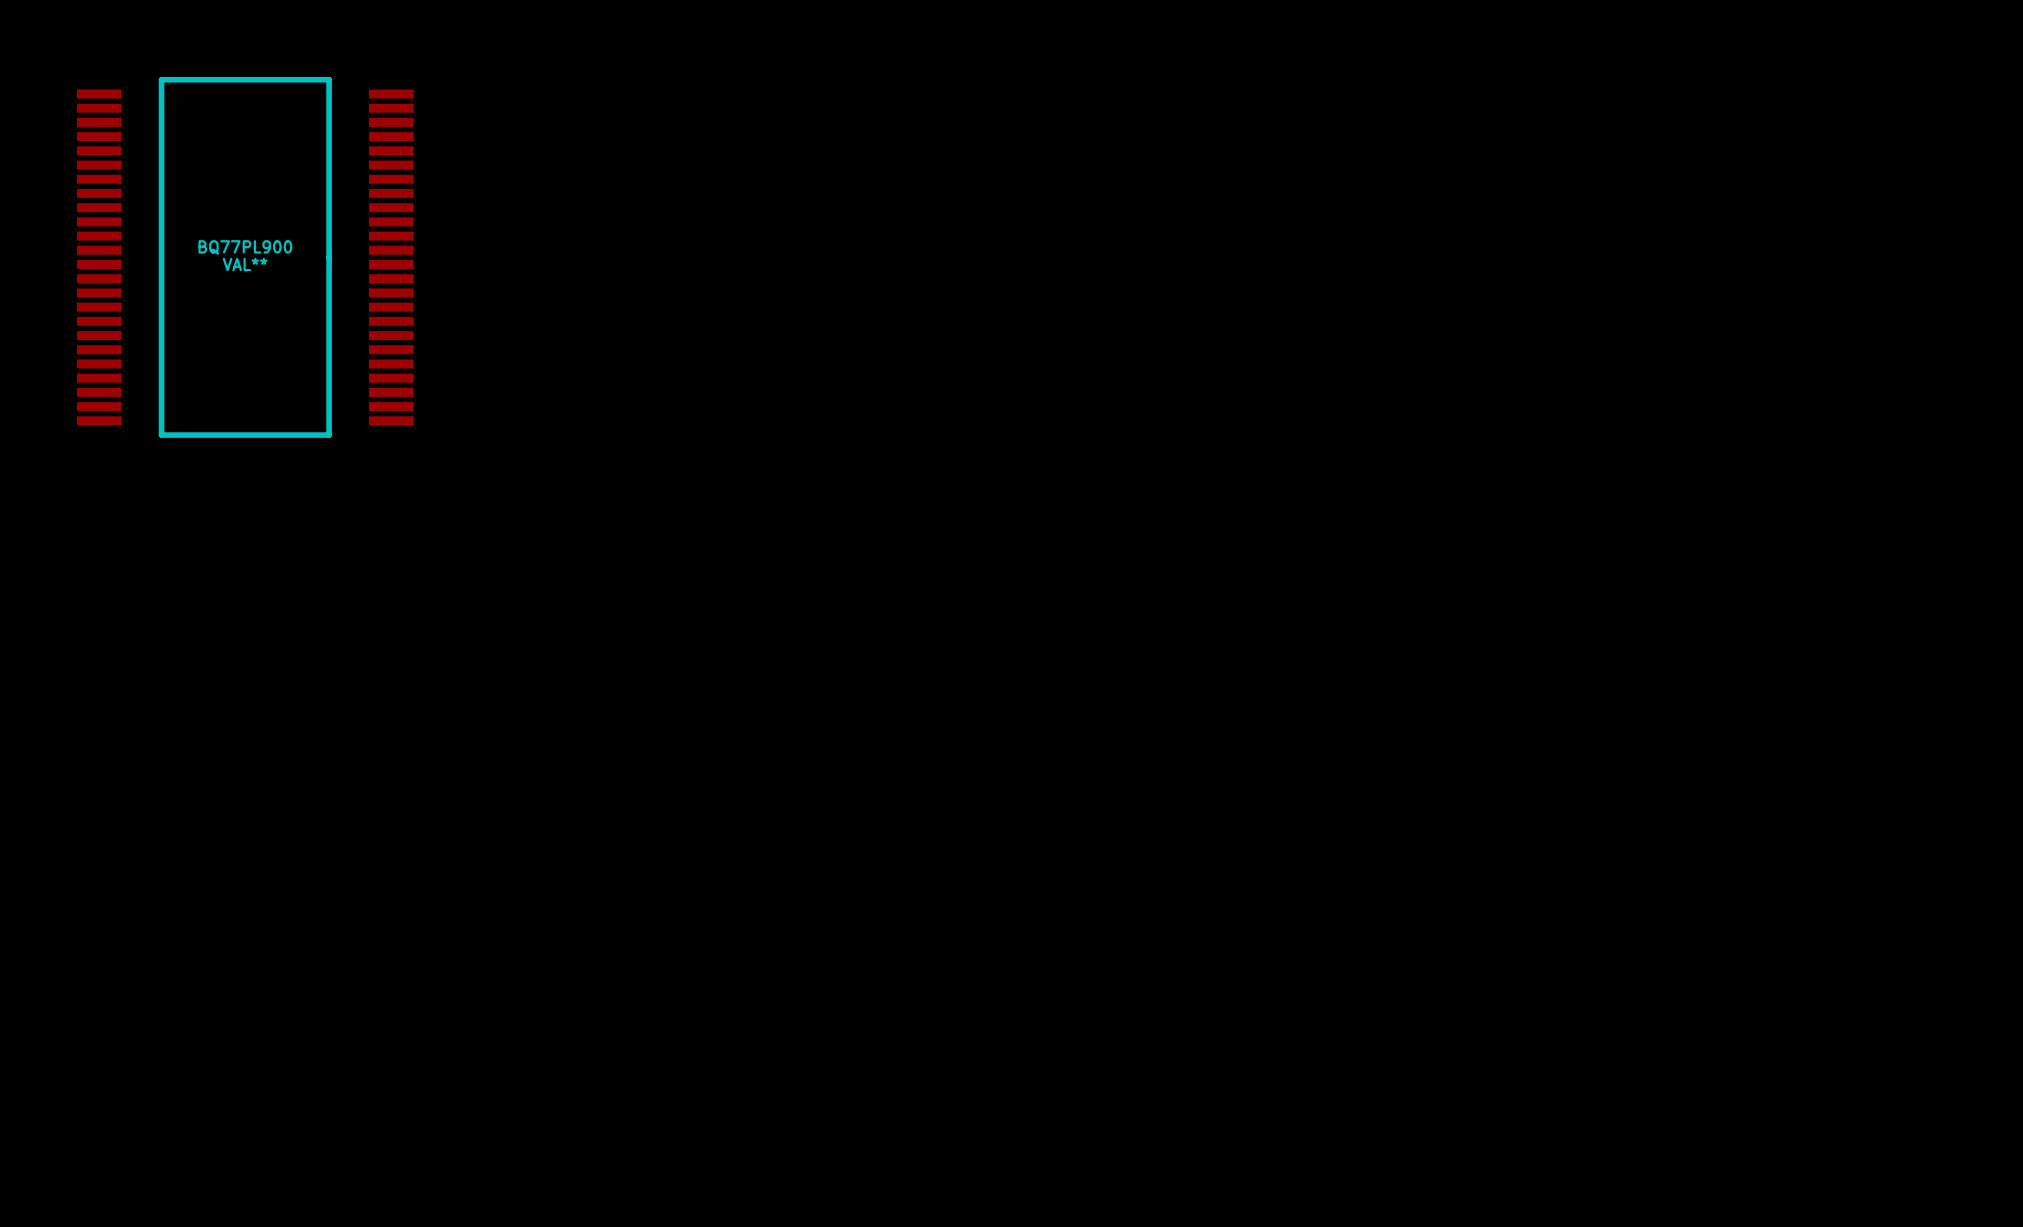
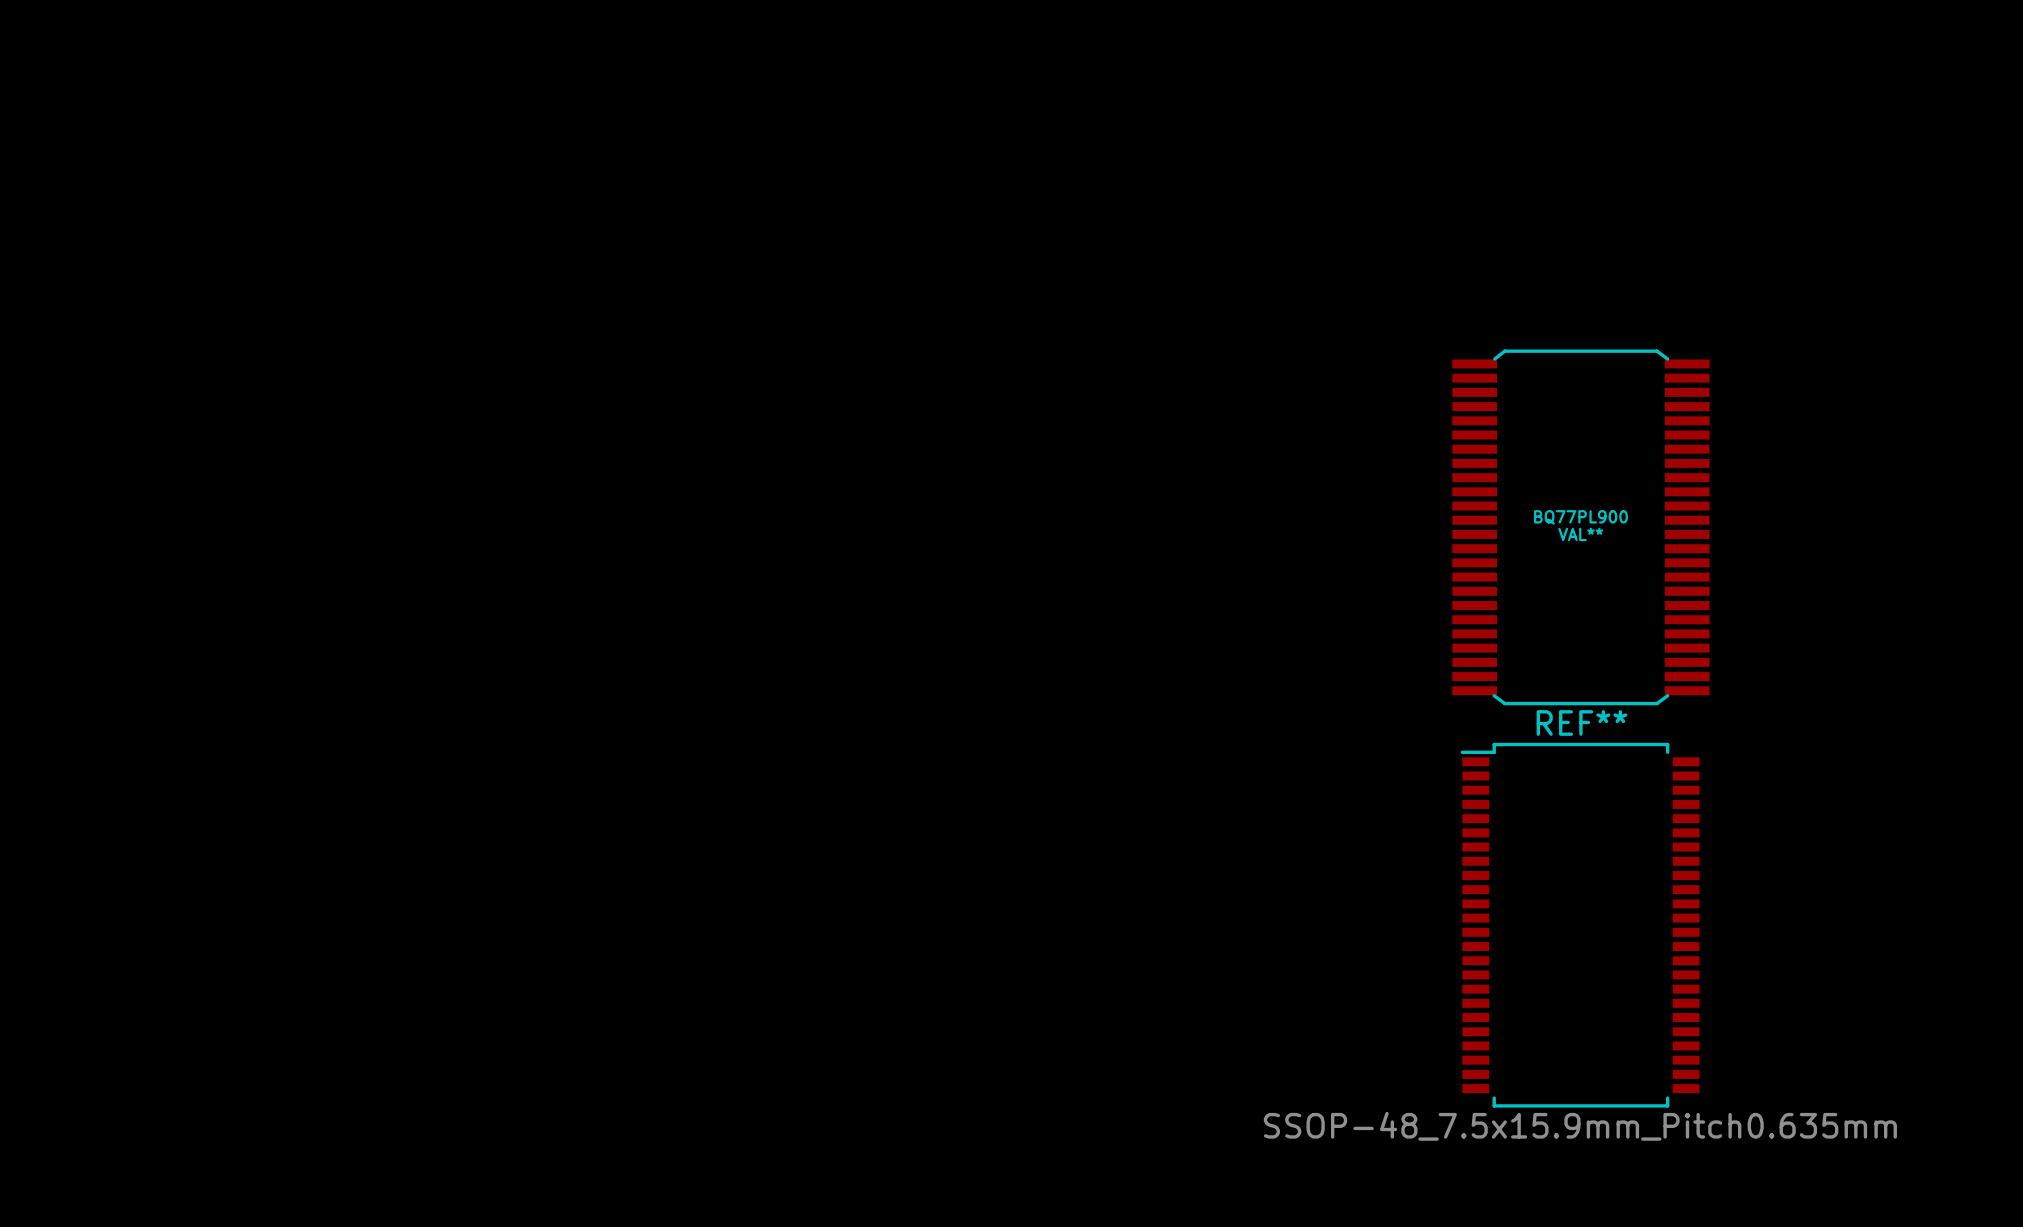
BQ77PL900 footprint: [76, 76, 414, 438] -> [1452, 349, 1710, 706]
REF**: none -> SSOP-48_7.5x15.9mm_Pitch0.635mm (1580, 925)

